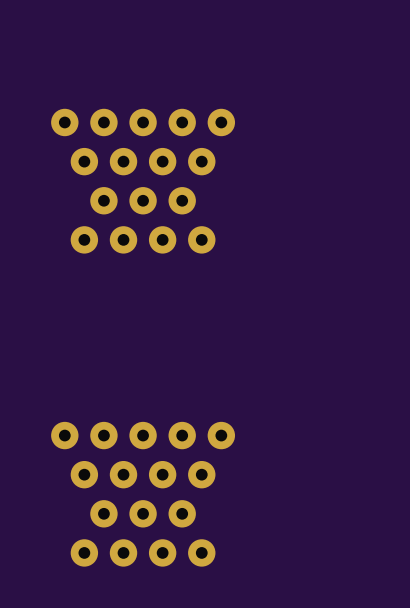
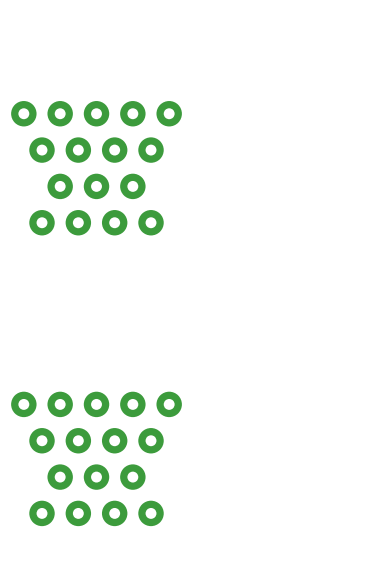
via: none -> (23, 113)
via: (221, 122) -> none
via: none -> (42, 150)
via: (201, 161) -> none
via: none -> (60, 186)
via: (182, 200) -> none
via: none -> (42, 222)
via: (201, 239) -> none
via: none -> (23, 404)
via: (221, 435) -> none
via: none -> (42, 440)
via: (201, 474) -> none
via: none -> (60, 477)
via: (182, 513) -> none
via: none -> (42, 513)
via: (201, 552) -> none

